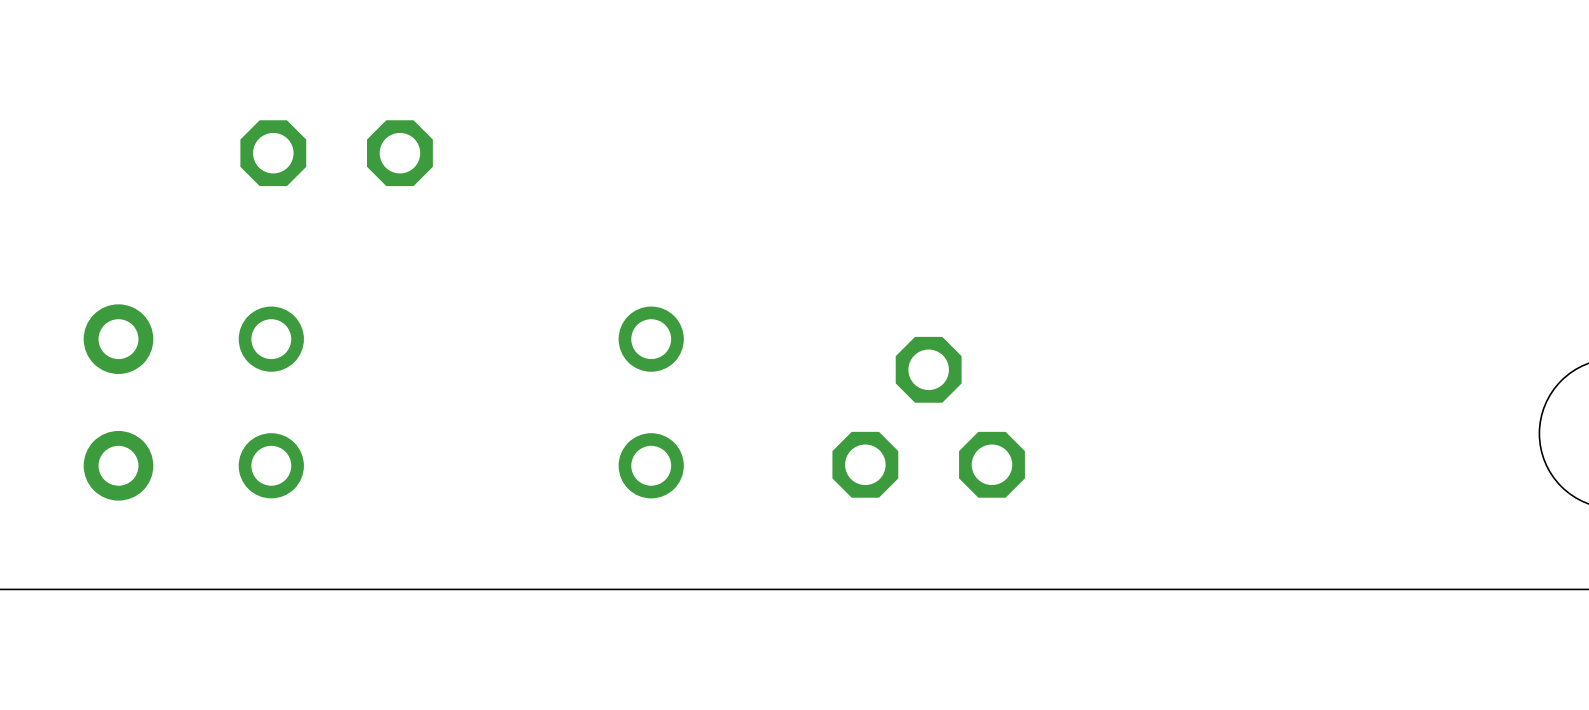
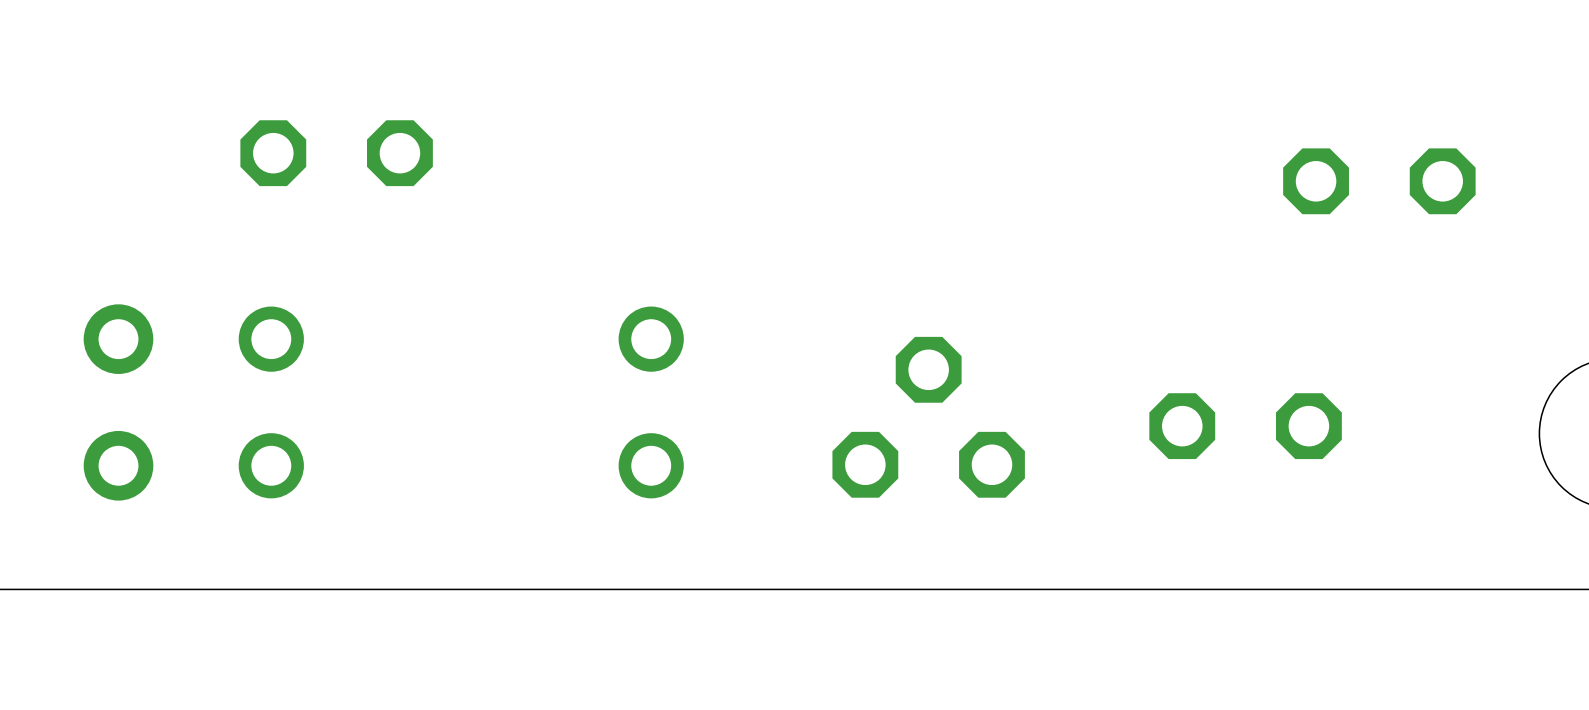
part: none -> (1379, 181)
part: none -> (1245, 426)

